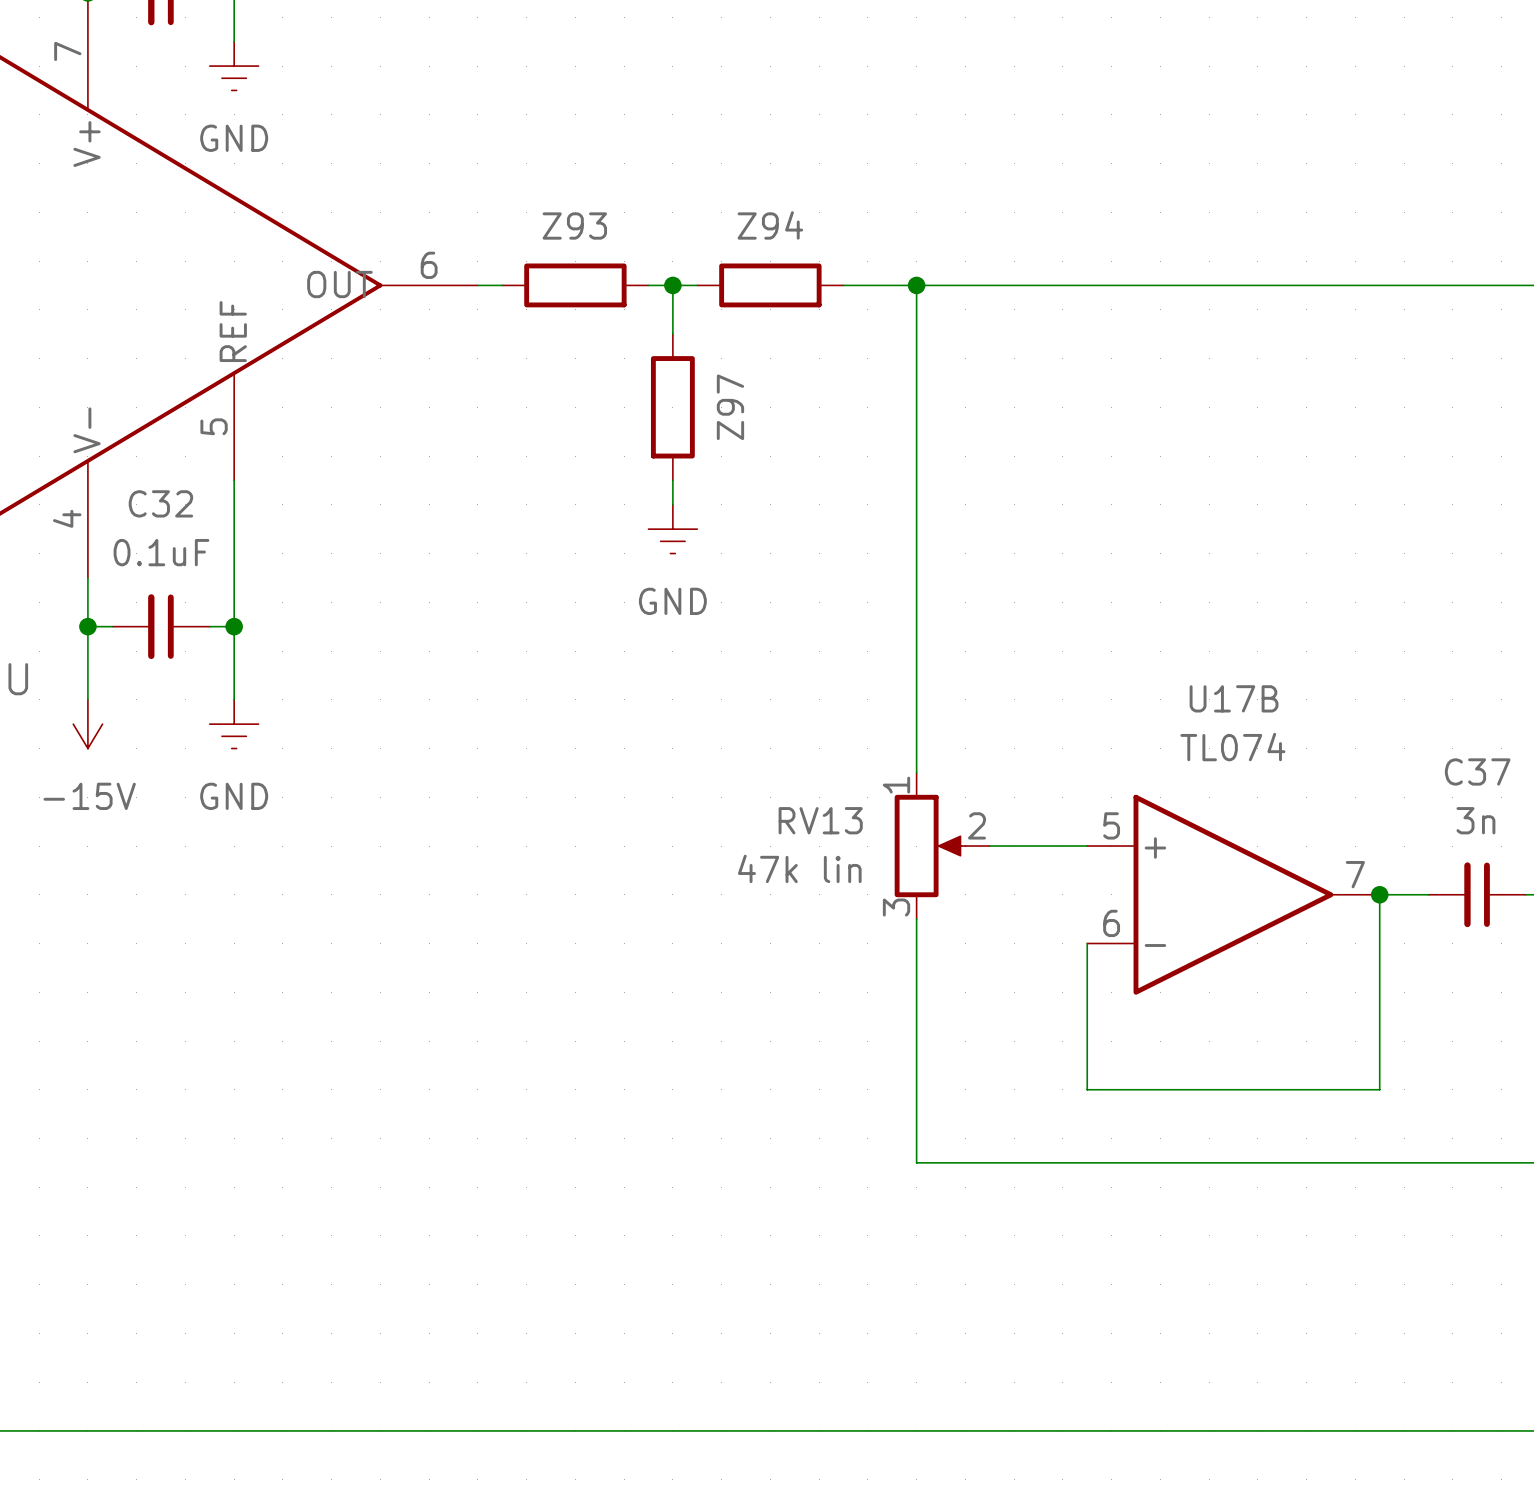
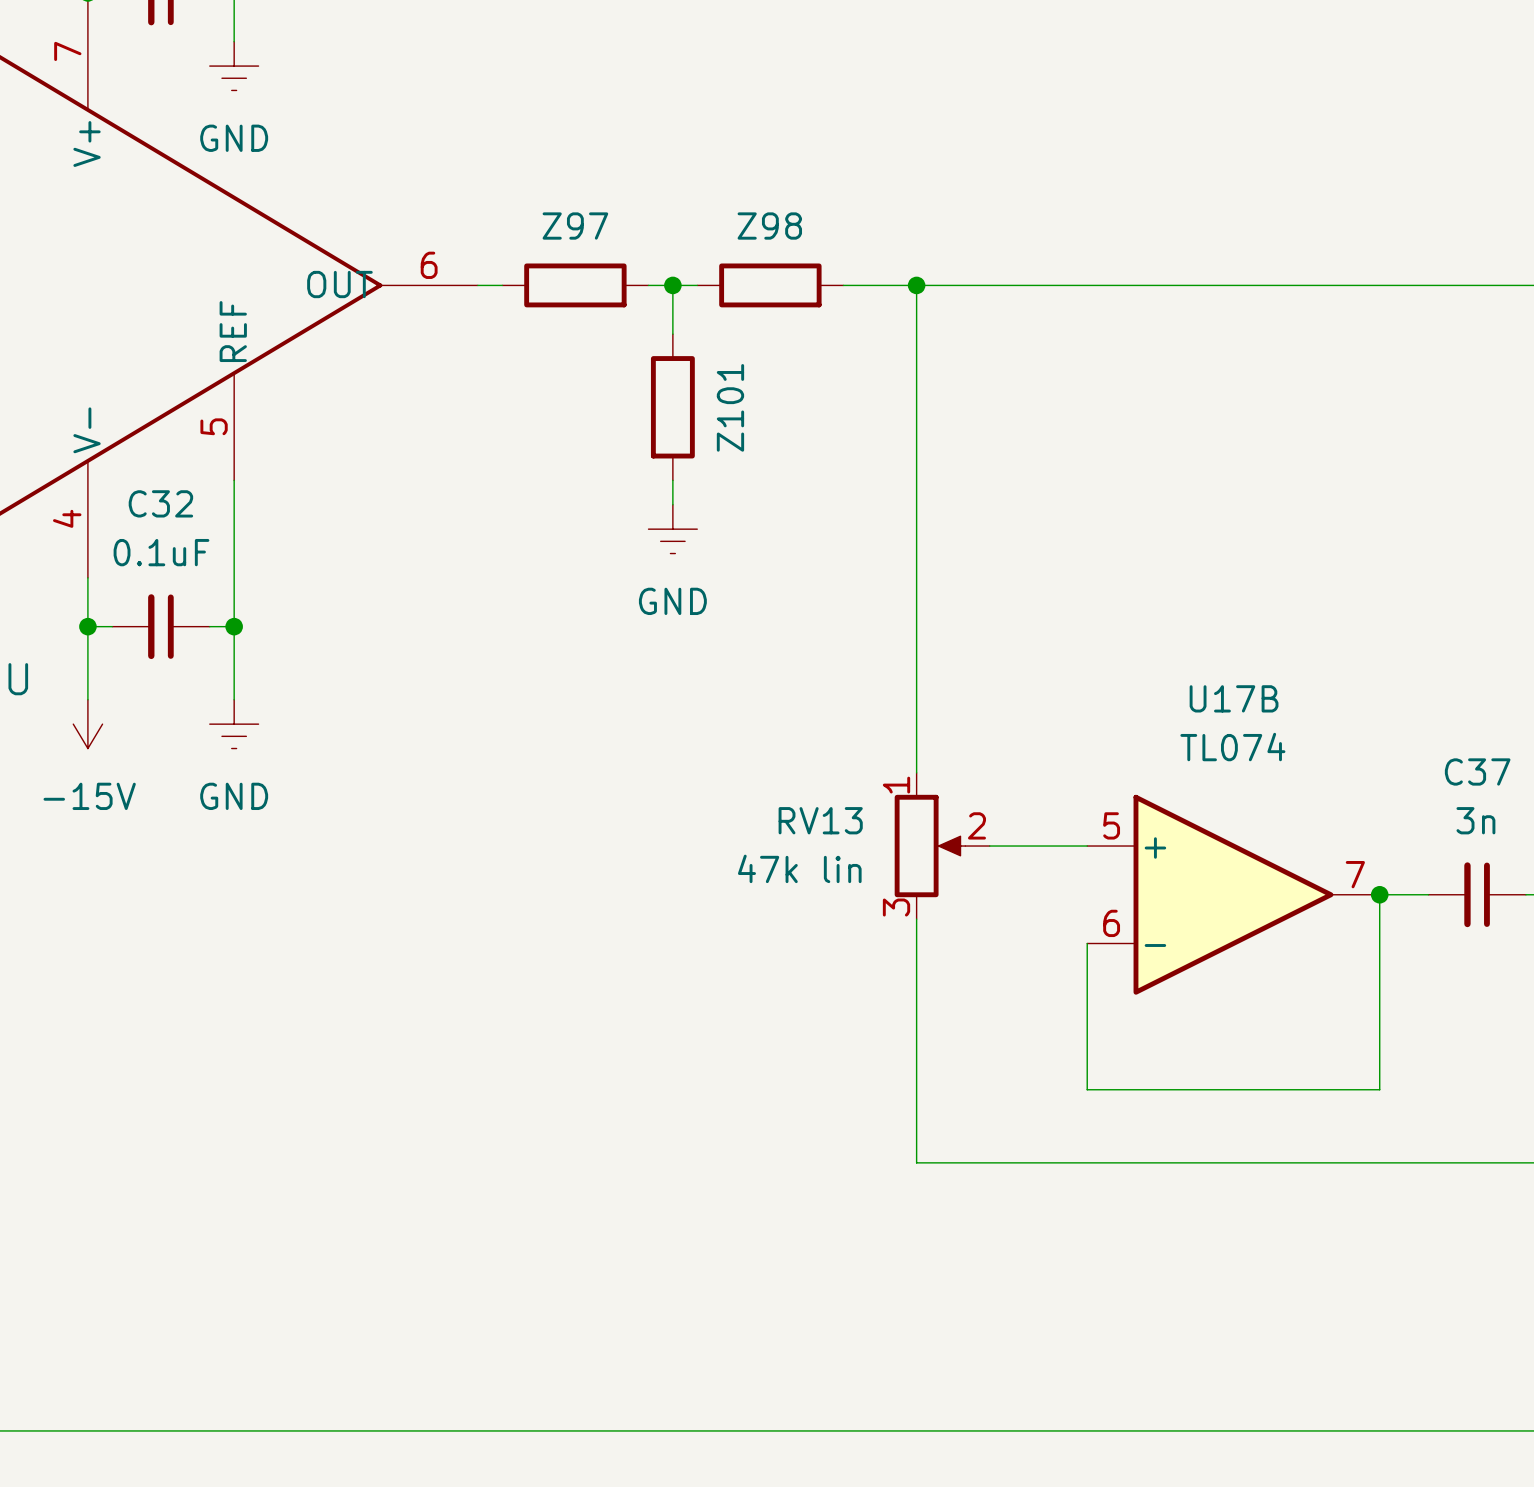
Z94 name: Z94 (770, 225) -> Z98 (769, 226)
Z93 name: Z93 (574, 226) -> Z97 (575, 226)
Z97 name: Z97 (730, 407) -> Z101 (730, 407)

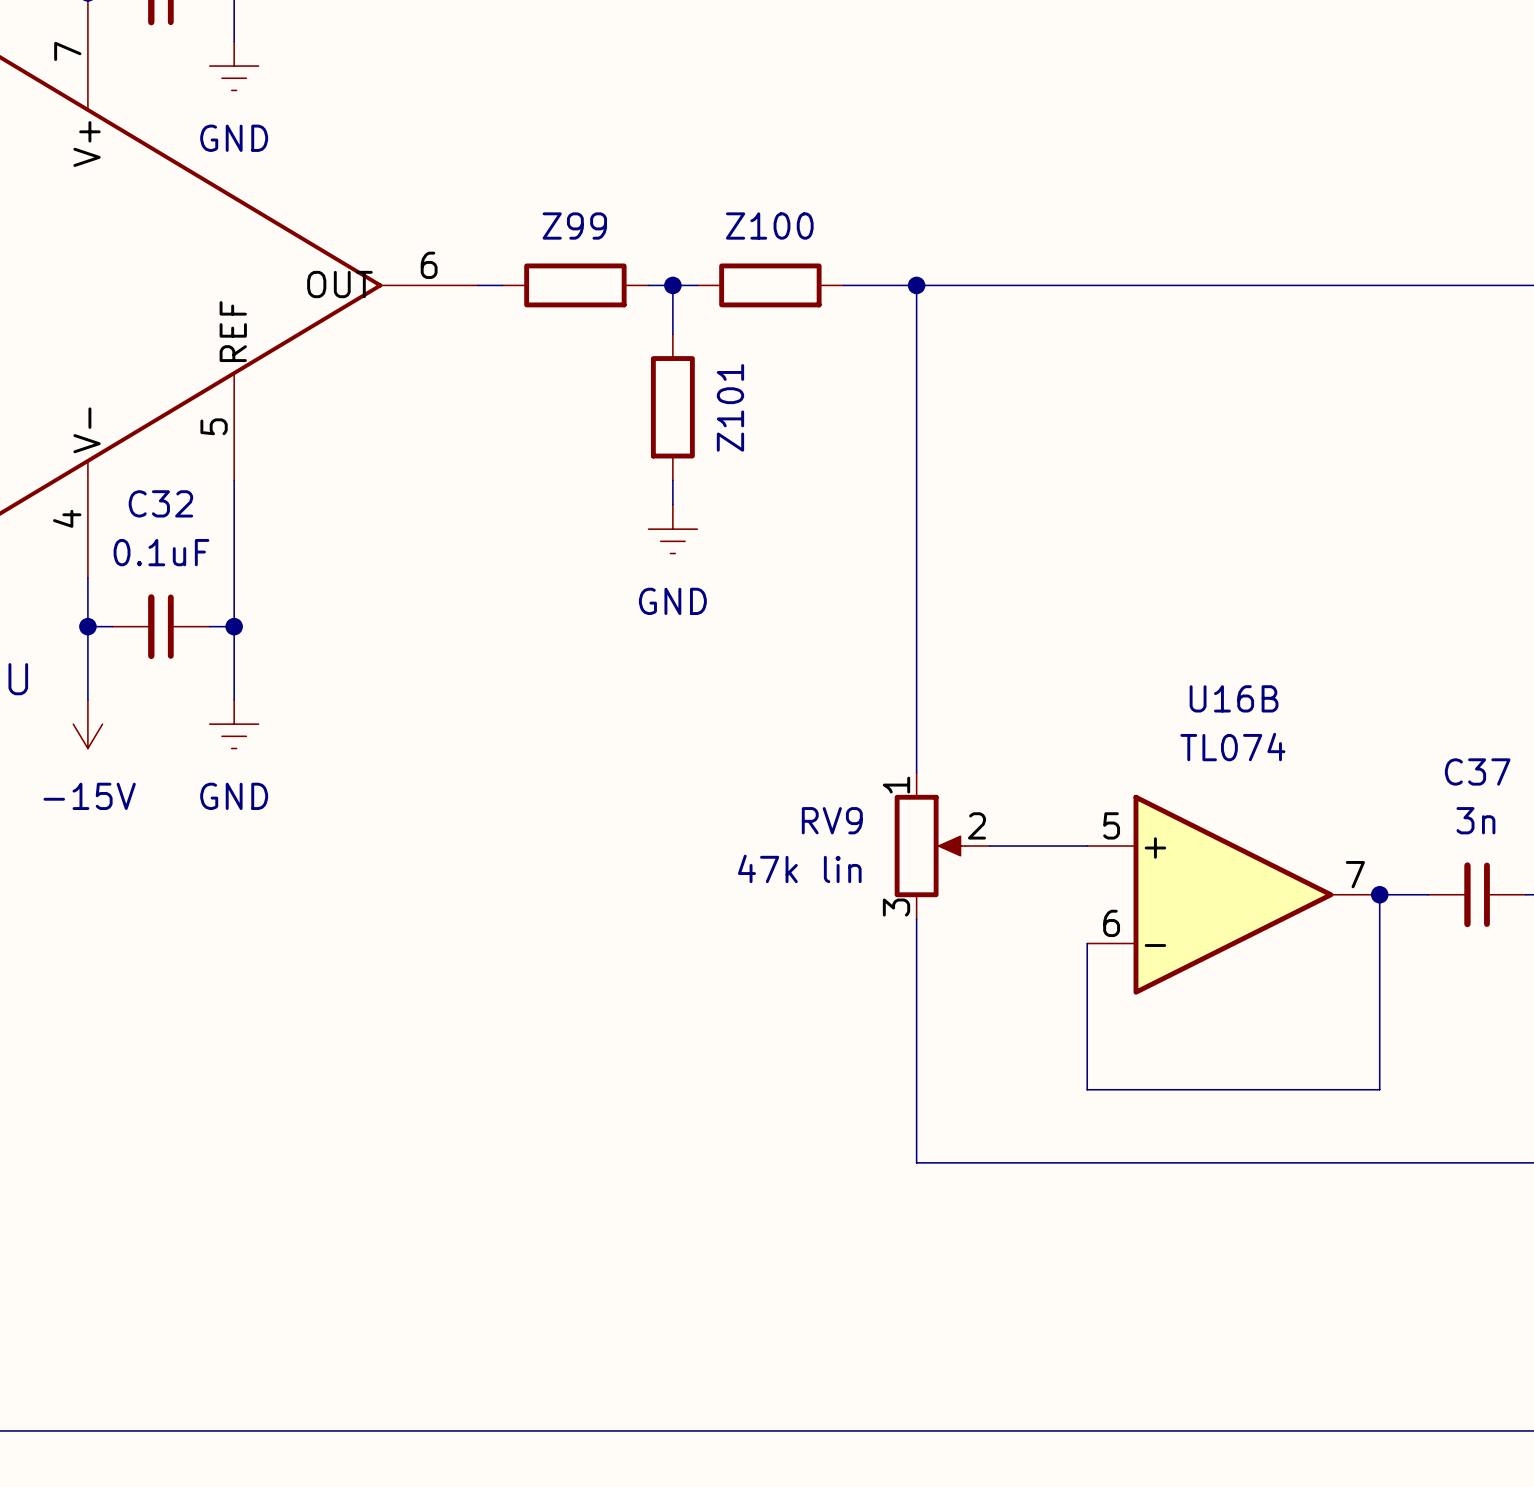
Z97 name: Z97 (575, 226) -> Z99 (574, 226)
Z98 name: Z98 (769, 226) -> Z100 (769, 226)
U17B name: U17B (1234, 698) -> U16B (1234, 698)
RV13 name: RV13 (820, 820) -> RV9 (832, 820)

